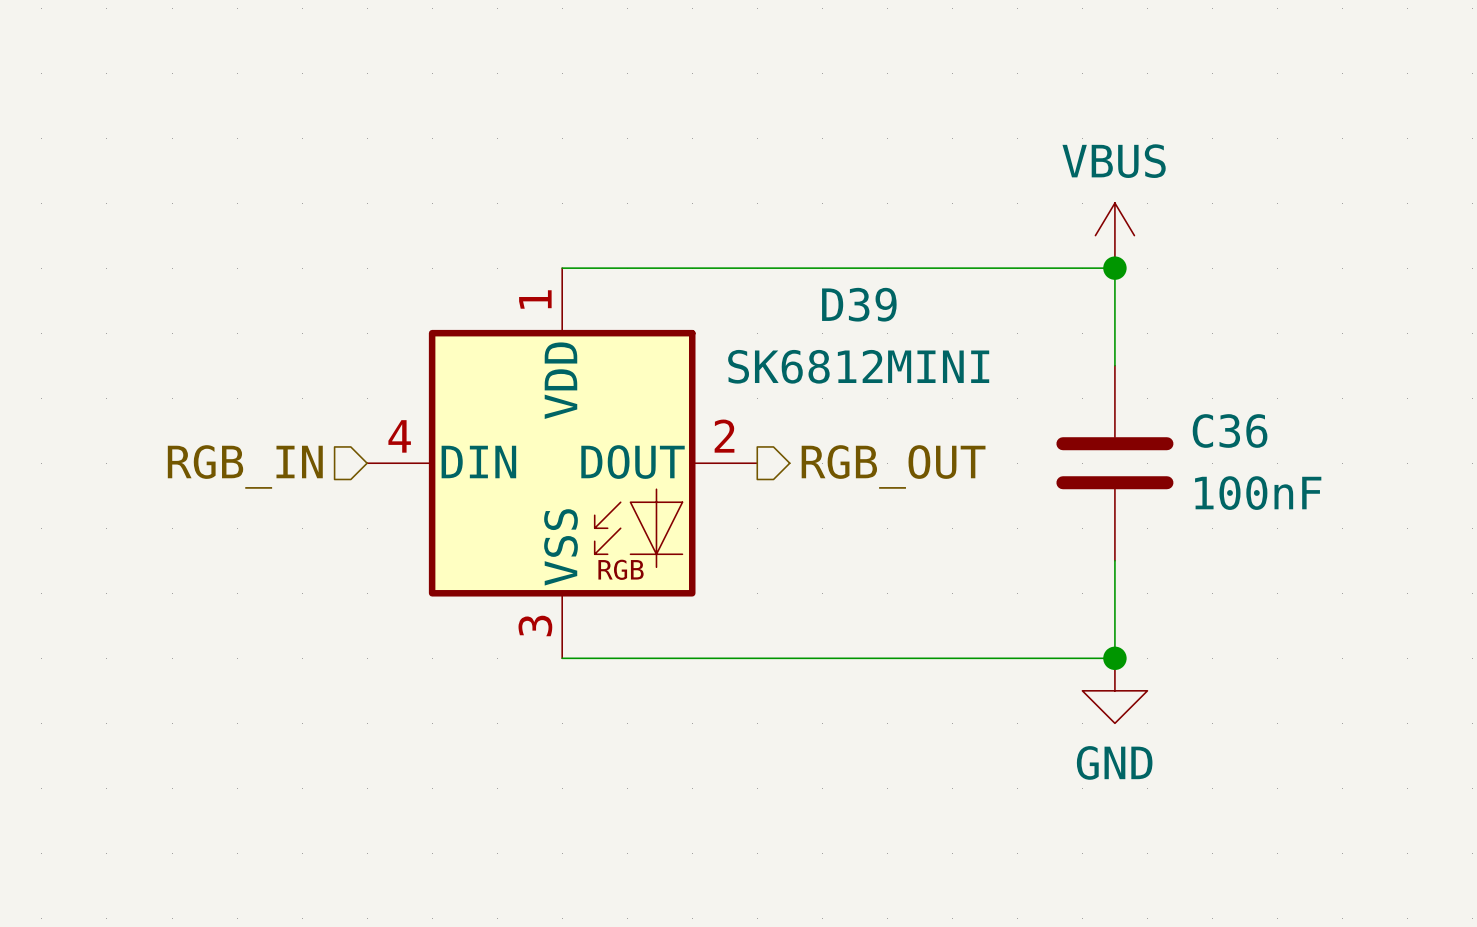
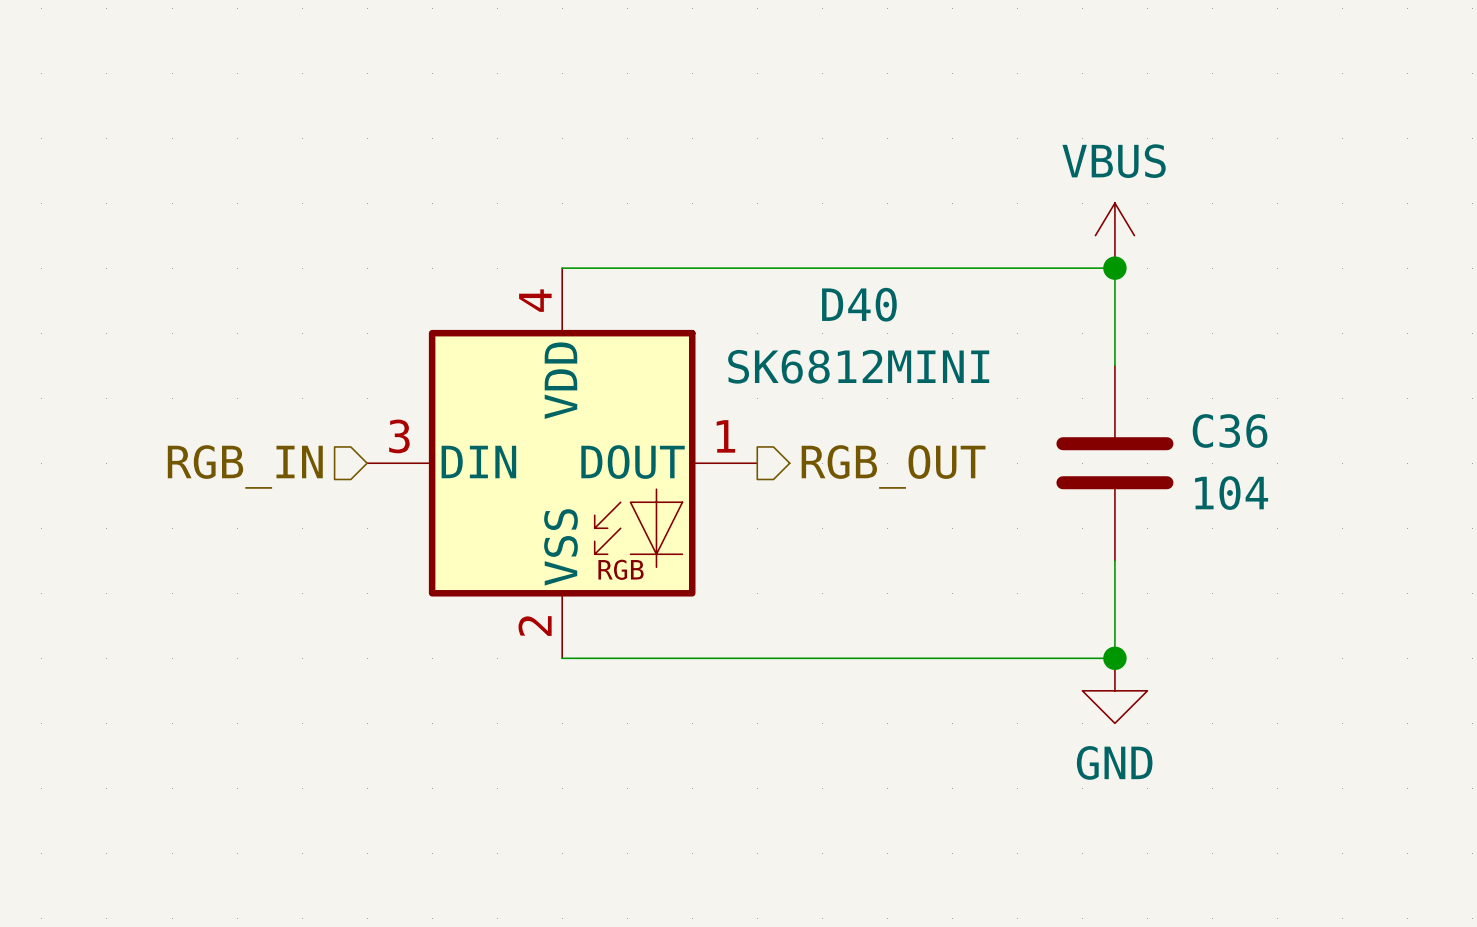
D39 pin number: 1 (535, 299) -> 4 (535, 300)
D39 name: D39 (859, 304) -> D40 (859, 304)
D39 pin number: 4 (399, 436) -> 3 (399, 436)
D39 pin number: 2 (724, 436) -> 1 (725, 436)
C36 value: 100nF (1258, 493) -> 104 (1231, 493)
D39 pin number: 3 (535, 625) -> 2 (535, 626)

